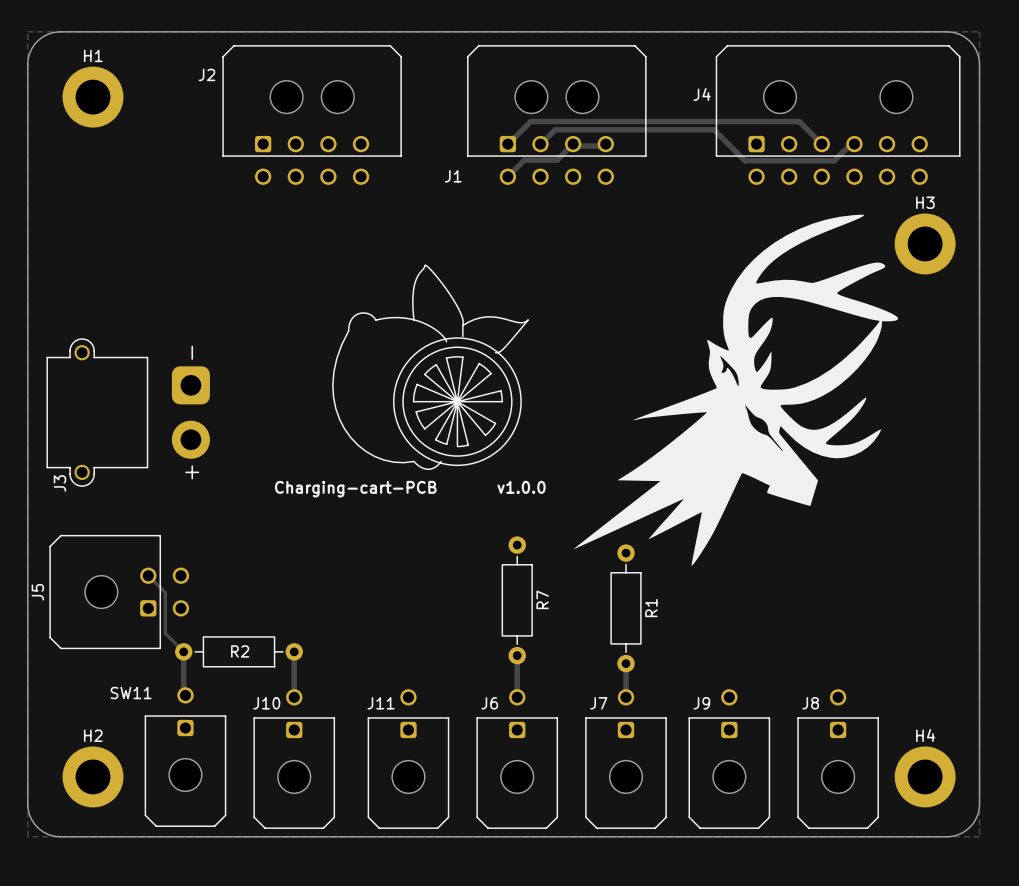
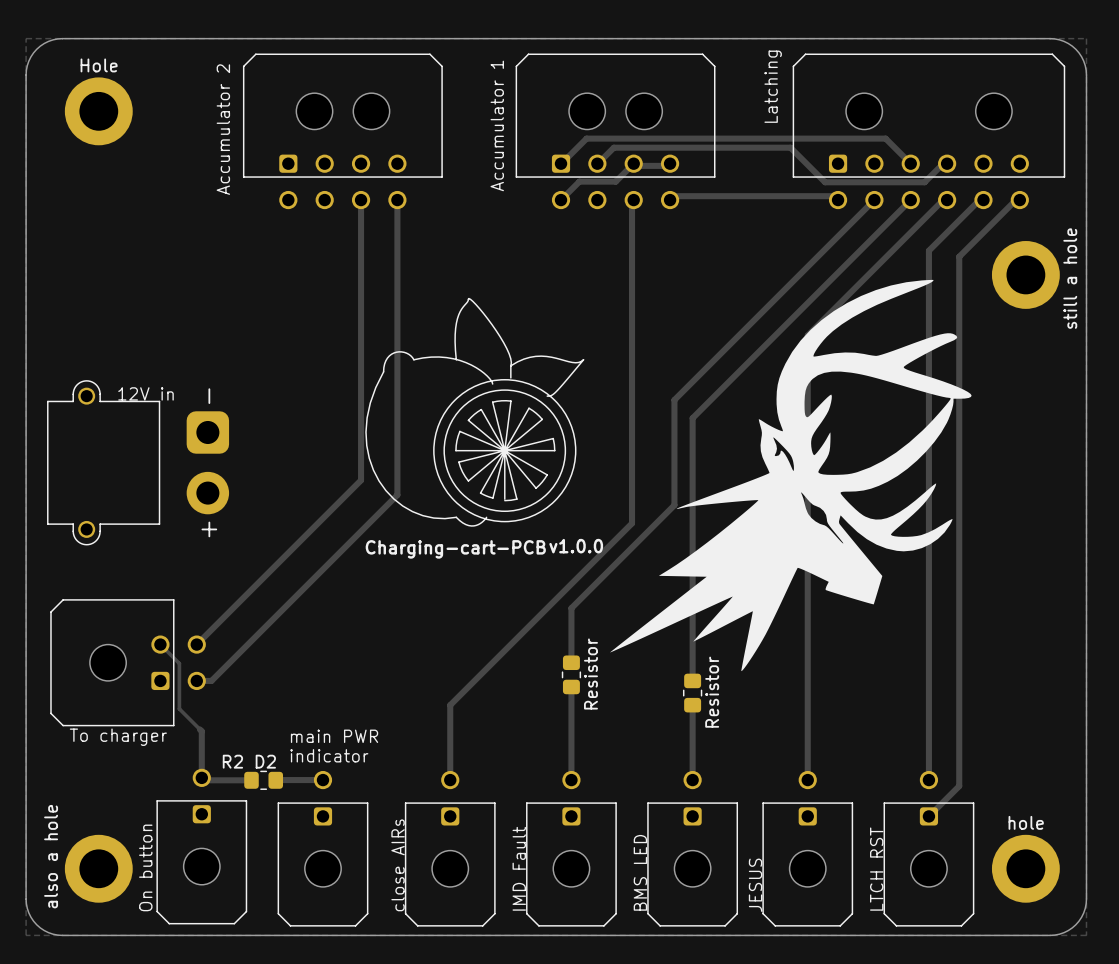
H1 name: H1 (93, 55) -> Hole (99, 65)
J2 name: J2 (206, 74) -> none
text: none -> Latching (773, 86)
J4 name: J4 (702, 94) -> none
text: none -> Accumulator 1 (497, 125)
text: none -> Accumulator 2 (223, 129)
track: none -> (674, 196) (838, 196)
track: none -> (947, 196) (807, 335) (807, 776)
track: none -> (983, 196) (928, 250) (928, 780)
track: none -> (1019, 196) (959, 256) (959, 786) (928, 816)
track: none -> (361, 200) (361, 480) (196, 644)
track: none -> (397, 200) (397, 495) (211, 680) (196, 680)
J1 name: J1 (453, 176) -> none
track: none -> (874, 200) (674, 400) (674, 505) (571, 608) (571, 662)
track: none -> (910, 200) (692, 418) (692, 680)
track: none -> (632, 202) (632, 523) (450, 705) (450, 776)
H3 name: H3 (925, 202) -> still a hole (1070, 278)
text: none -> 12V in (145, 393)
drawing position: (735, 390) -> (790, 475)
J3 name: J3 (59, 483) -> none
text position: Charging-cart-PCB (355, 489) -> Charging-cart-PCB (455, 549)
J5 name: J5 (37, 592) -> none
R7: (517, 600) -> none
Resistor: none -> (571, 674)
R1: (626, 608) -> none
track: none -> (571, 686) (571, 733)
Resistor: none -> (692, 693)
track: none -> (692, 705) (692, 742)
track: (183, 651) (183, 690) -> (199, 729) (201, 731) (202, 780) (251, 780)
R2: (238, 651) -> none
track: (294, 651) (294, 694) -> none
text: none -> To charger (118, 737)
text: none -> main PWR (334, 736)
text: none -> indicator (329, 755)
SW11 name: SW11 (131, 693) -> none
R2 D2: none -> (263, 780)
track: none -> (323, 780) (275, 780)
J10 name: J10 (266, 703) -> none
J11 name: J11 (381, 703) -> none
J6 name: J6 (489, 703) -> none
J7 name: J7 (598, 703) -> none
J9 name: J9 (701, 703) -> none
J8 name: J8 (810, 703) -> none
H2 name: H2 (93, 735) -> also a hole (51, 856)
H4 name: H4 (925, 735) -> hole (1026, 822)
text: none -> close AIRs (398, 865)
text: none -> On button (145, 867)
text: none -> IMD Fault (519, 868)
text: none -> LTCH RST (876, 869)
text: none -> BMS LED (640, 872)
text: none -> JESUS (755, 885)

